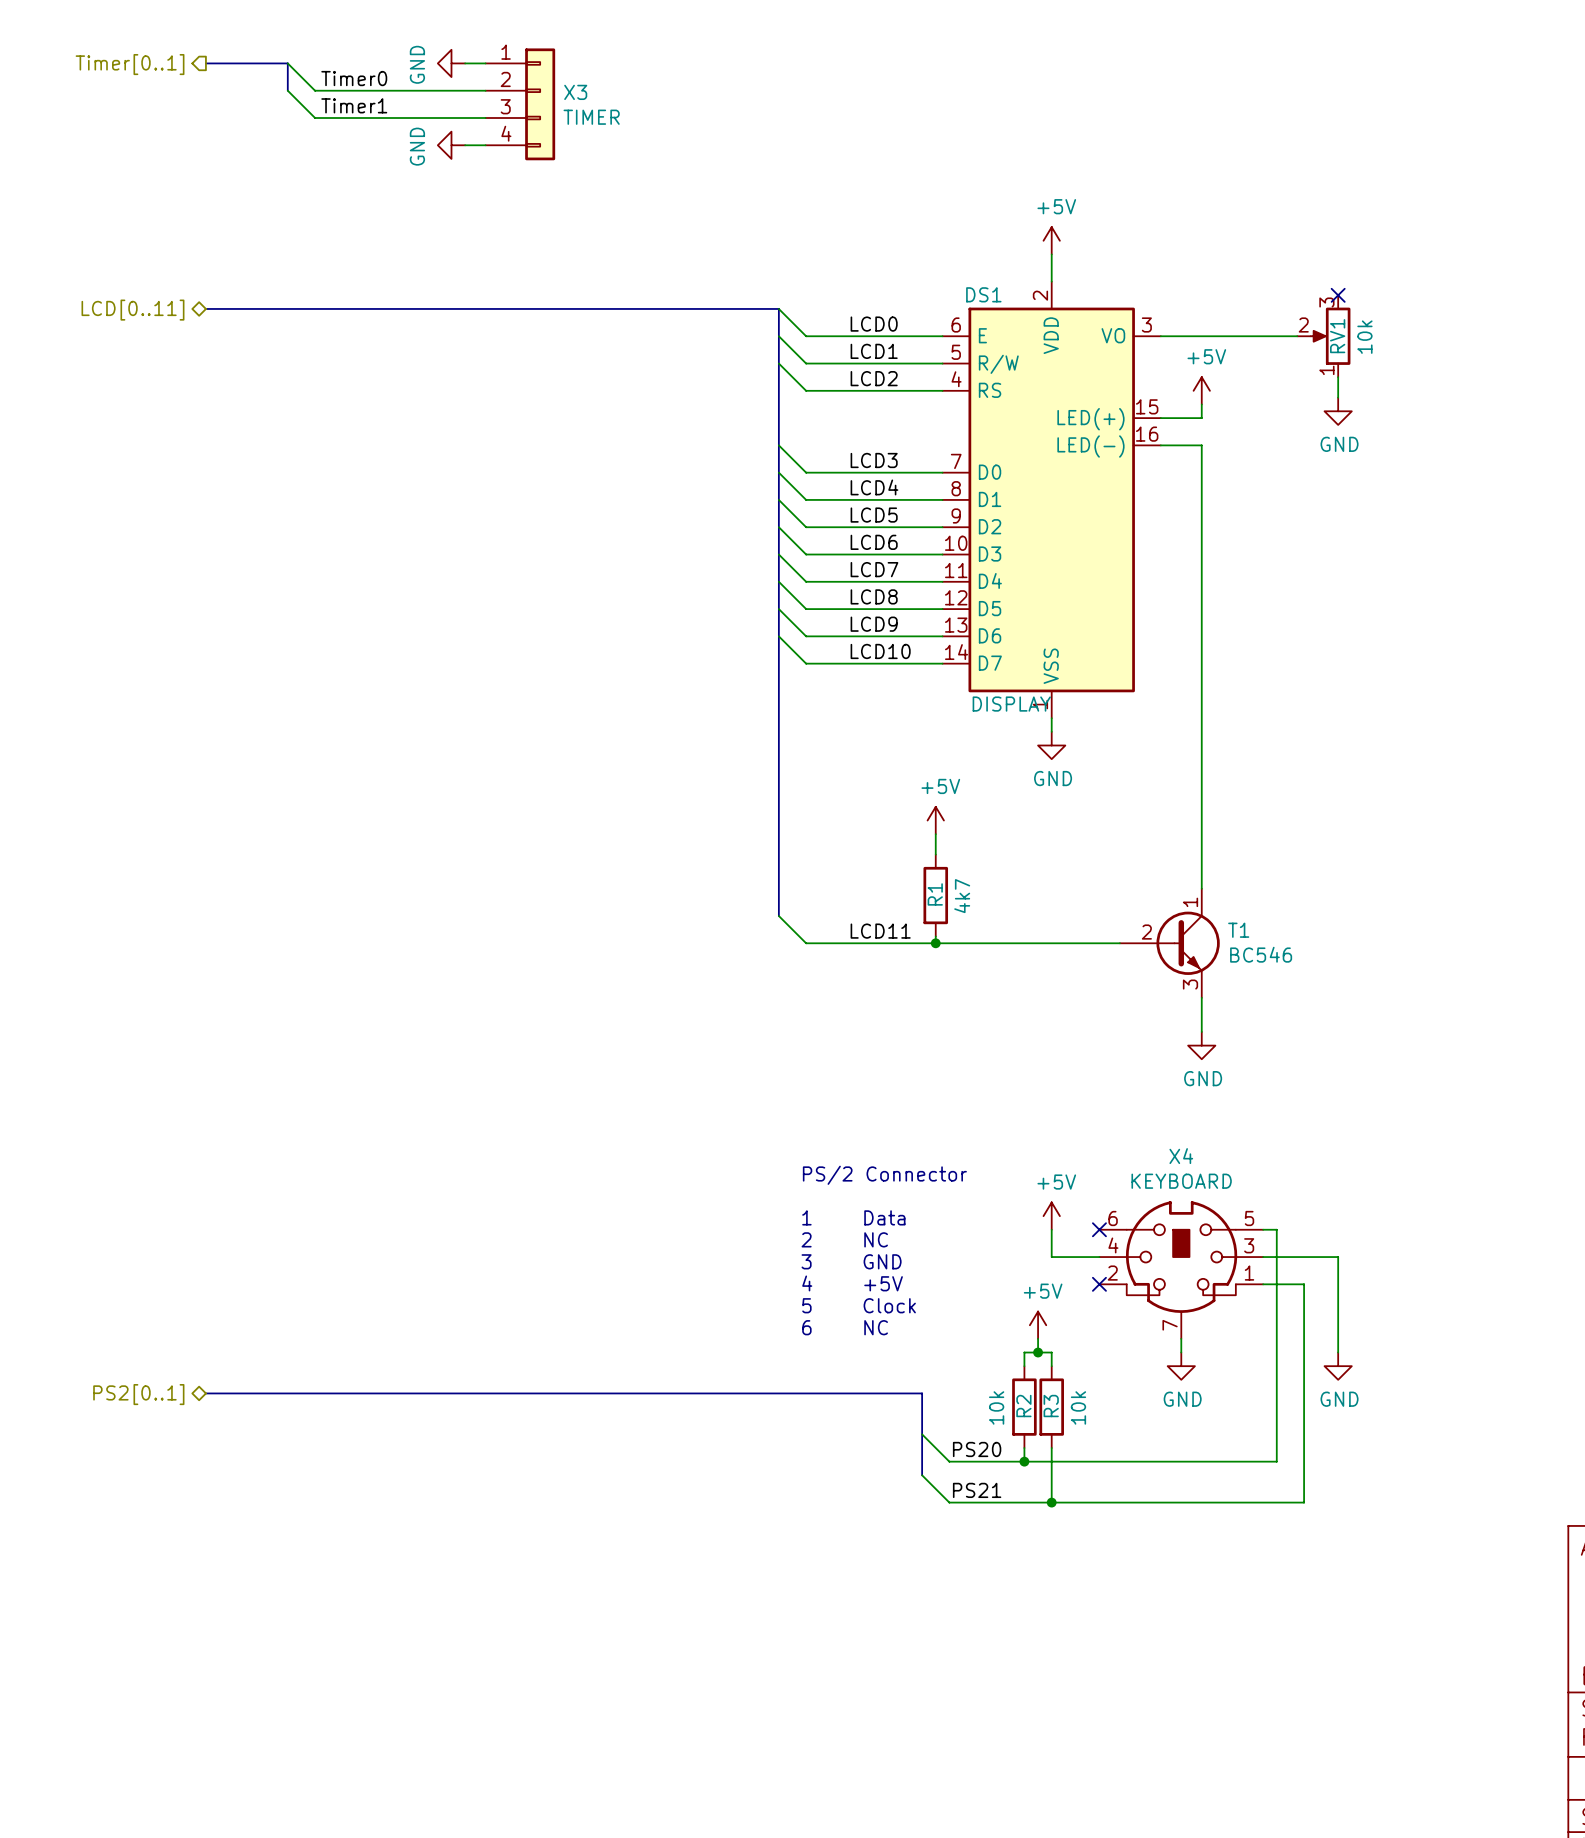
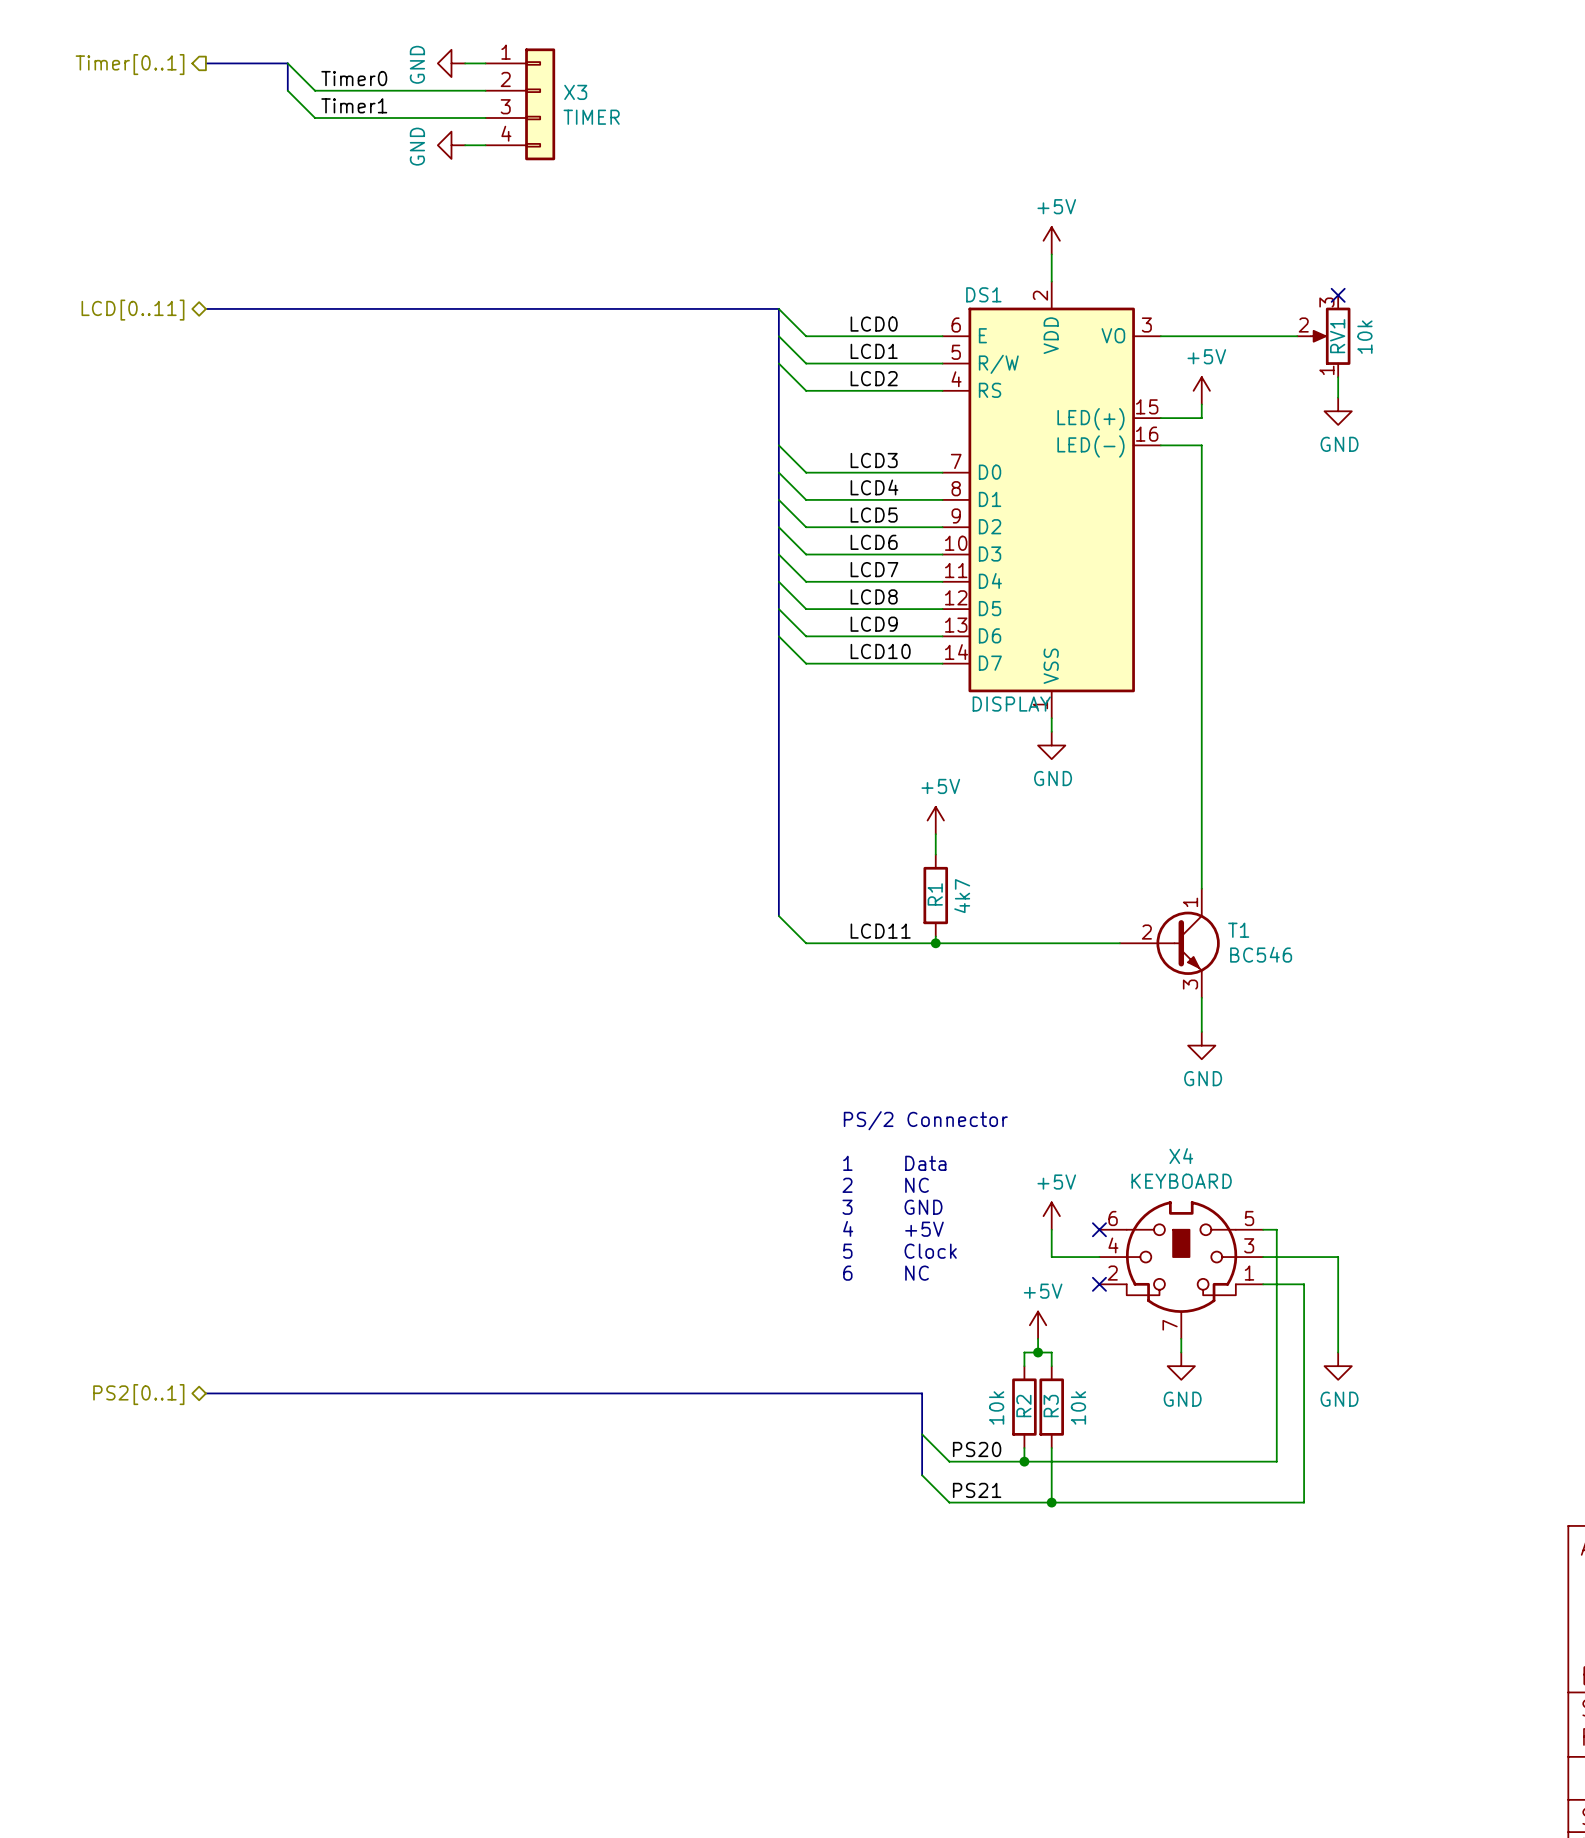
text position: PS/2 Connector (884, 1175) -> PS/2 Connector (925, 1120)
text: none -> NC (917, 1185)
text position: 1 (806, 1217) -> 1 (847, 1163)
text position: Data (884, 1217) -> Data (925, 1163)
text position: 2 (806, 1239) -> 2 (847, 1185)
text: NC (876, 1239) -> none
text position: 3 (806, 1261) -> 3 (847, 1207)
text position: GND (882, 1261) -> GND (923, 1207)
text: none -> NC (917, 1273)
text position: 4 (807, 1283) -> 4 (848, 1228)
text position: +5V (883, 1283) -> +5V (924, 1229)
text position: 5 (806, 1305) -> 5 (847, 1251)
text position: Clock (889, 1305) -> Clock (930, 1251)
text position: 6 (806, 1327) -> 6 (847, 1273)
text: NC (876, 1327) -> none

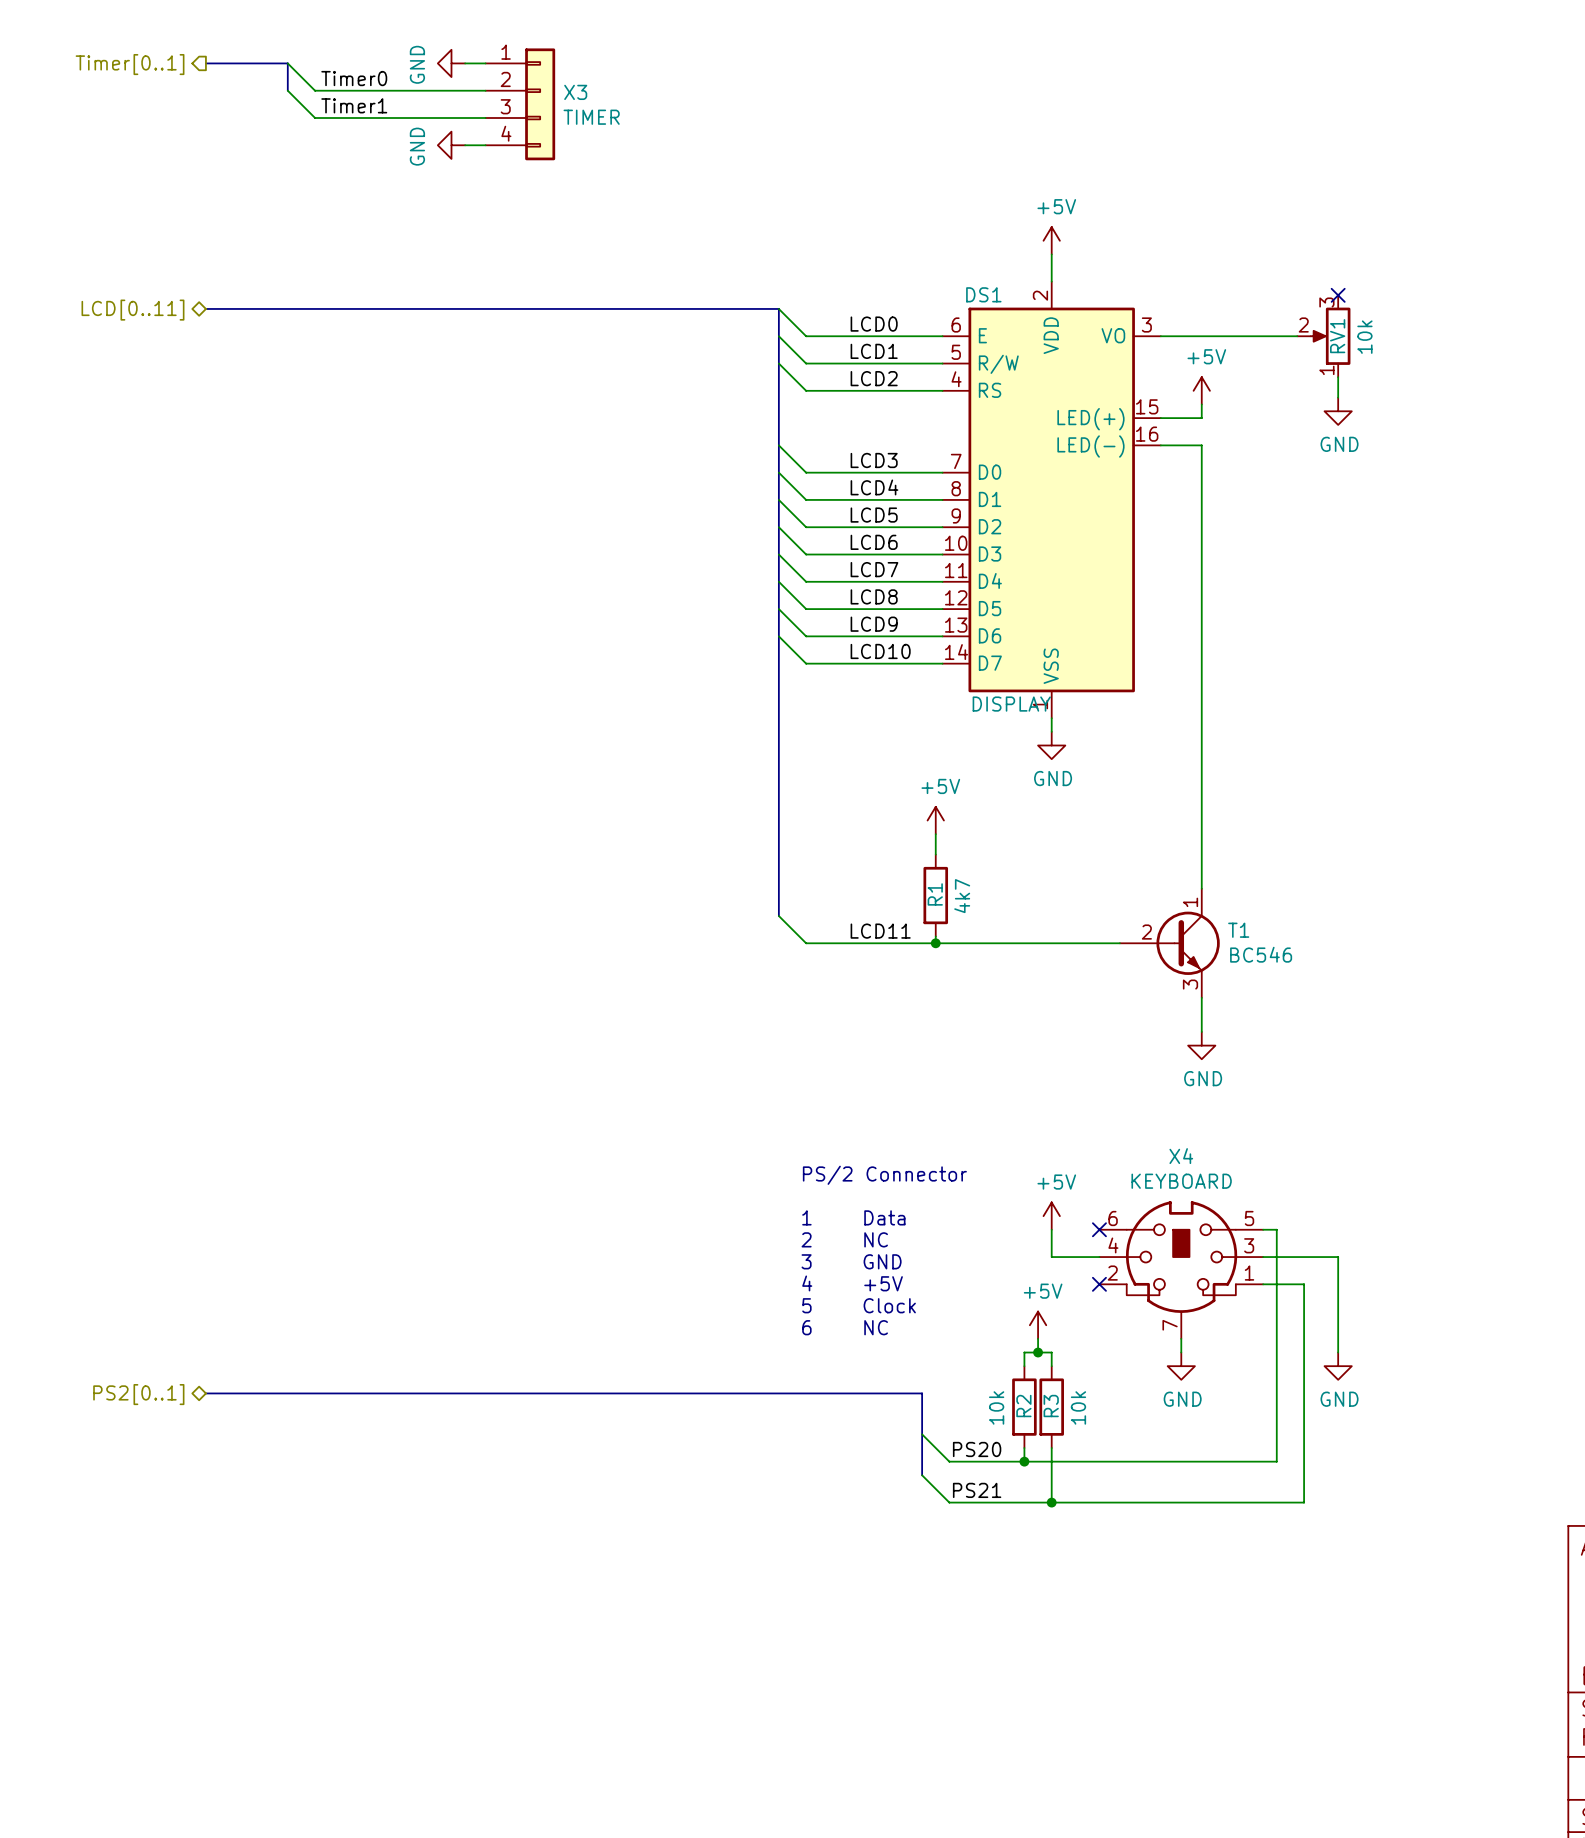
text position: PS/2 Connector (925, 1120) -> PS/2 Connector (884, 1175)
text position: 1 (847, 1163) -> 1 (806, 1217)
text position: Data (925, 1163) -> Data (884, 1217)
text position: 2 (847, 1185) -> 2 (806, 1239)
text: NC (917, 1185) -> none
text position: 3 (847, 1207) -> 3 (806, 1261)
text position: GND (923, 1207) -> GND (882, 1261)
text position: 4 (848, 1228) -> 4 (807, 1283)
text position: +5V (924, 1229) -> +5V (883, 1283)
text: none -> NC (876, 1239)
text position: 5 (847, 1251) -> 5 (806, 1305)
text position: Clock (930, 1251) -> Clock (889, 1305)
text position: 6 (847, 1273) -> 6 (806, 1327)
text: NC (917, 1273) -> none
text: none -> NC (876, 1327)

